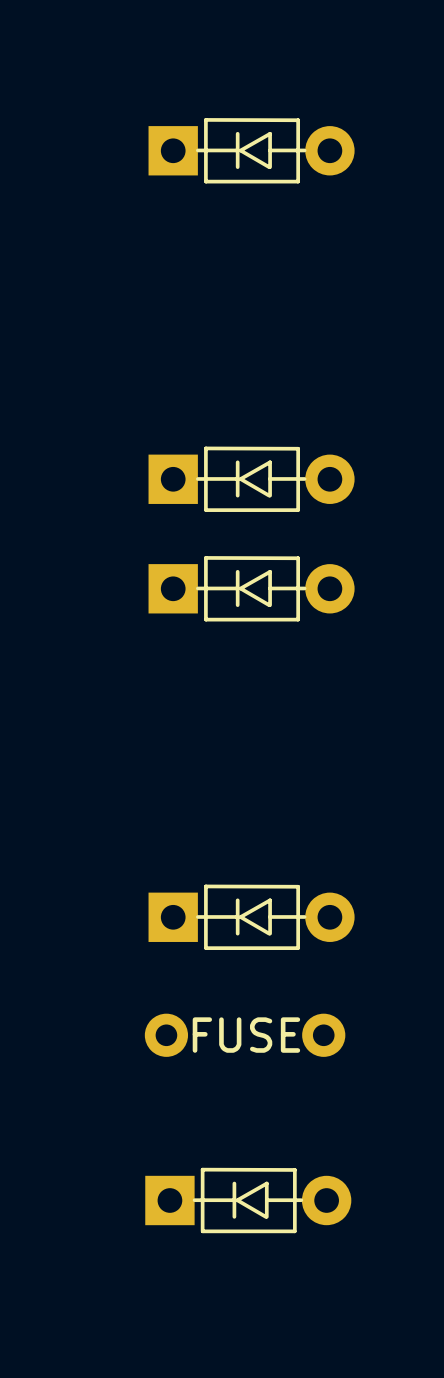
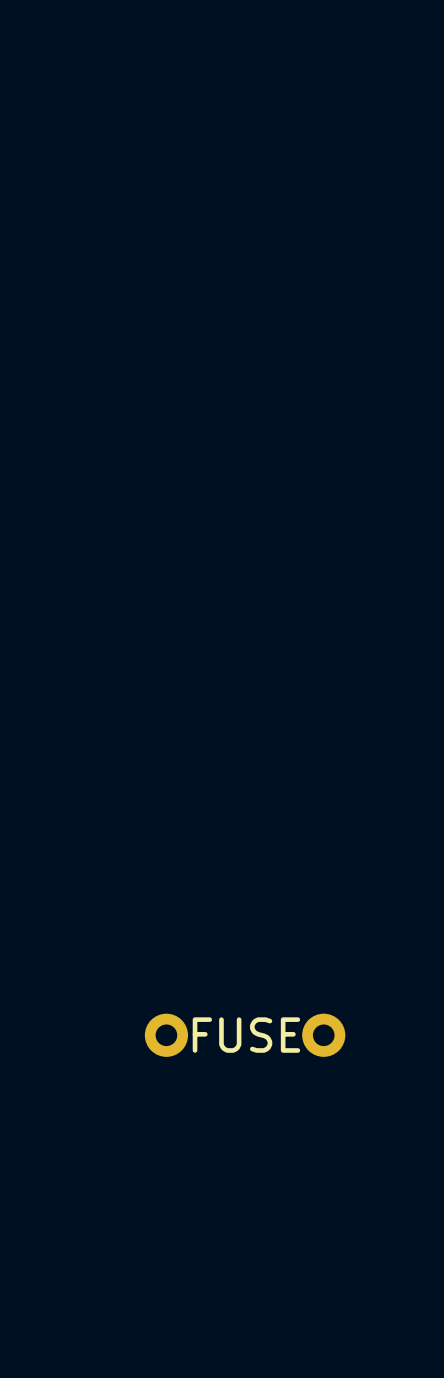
part: (251, 150) -> none
part: (251, 479) -> none
part: (251, 588) -> none
part: (251, 917) -> none
part: (248, 1200) -> none

